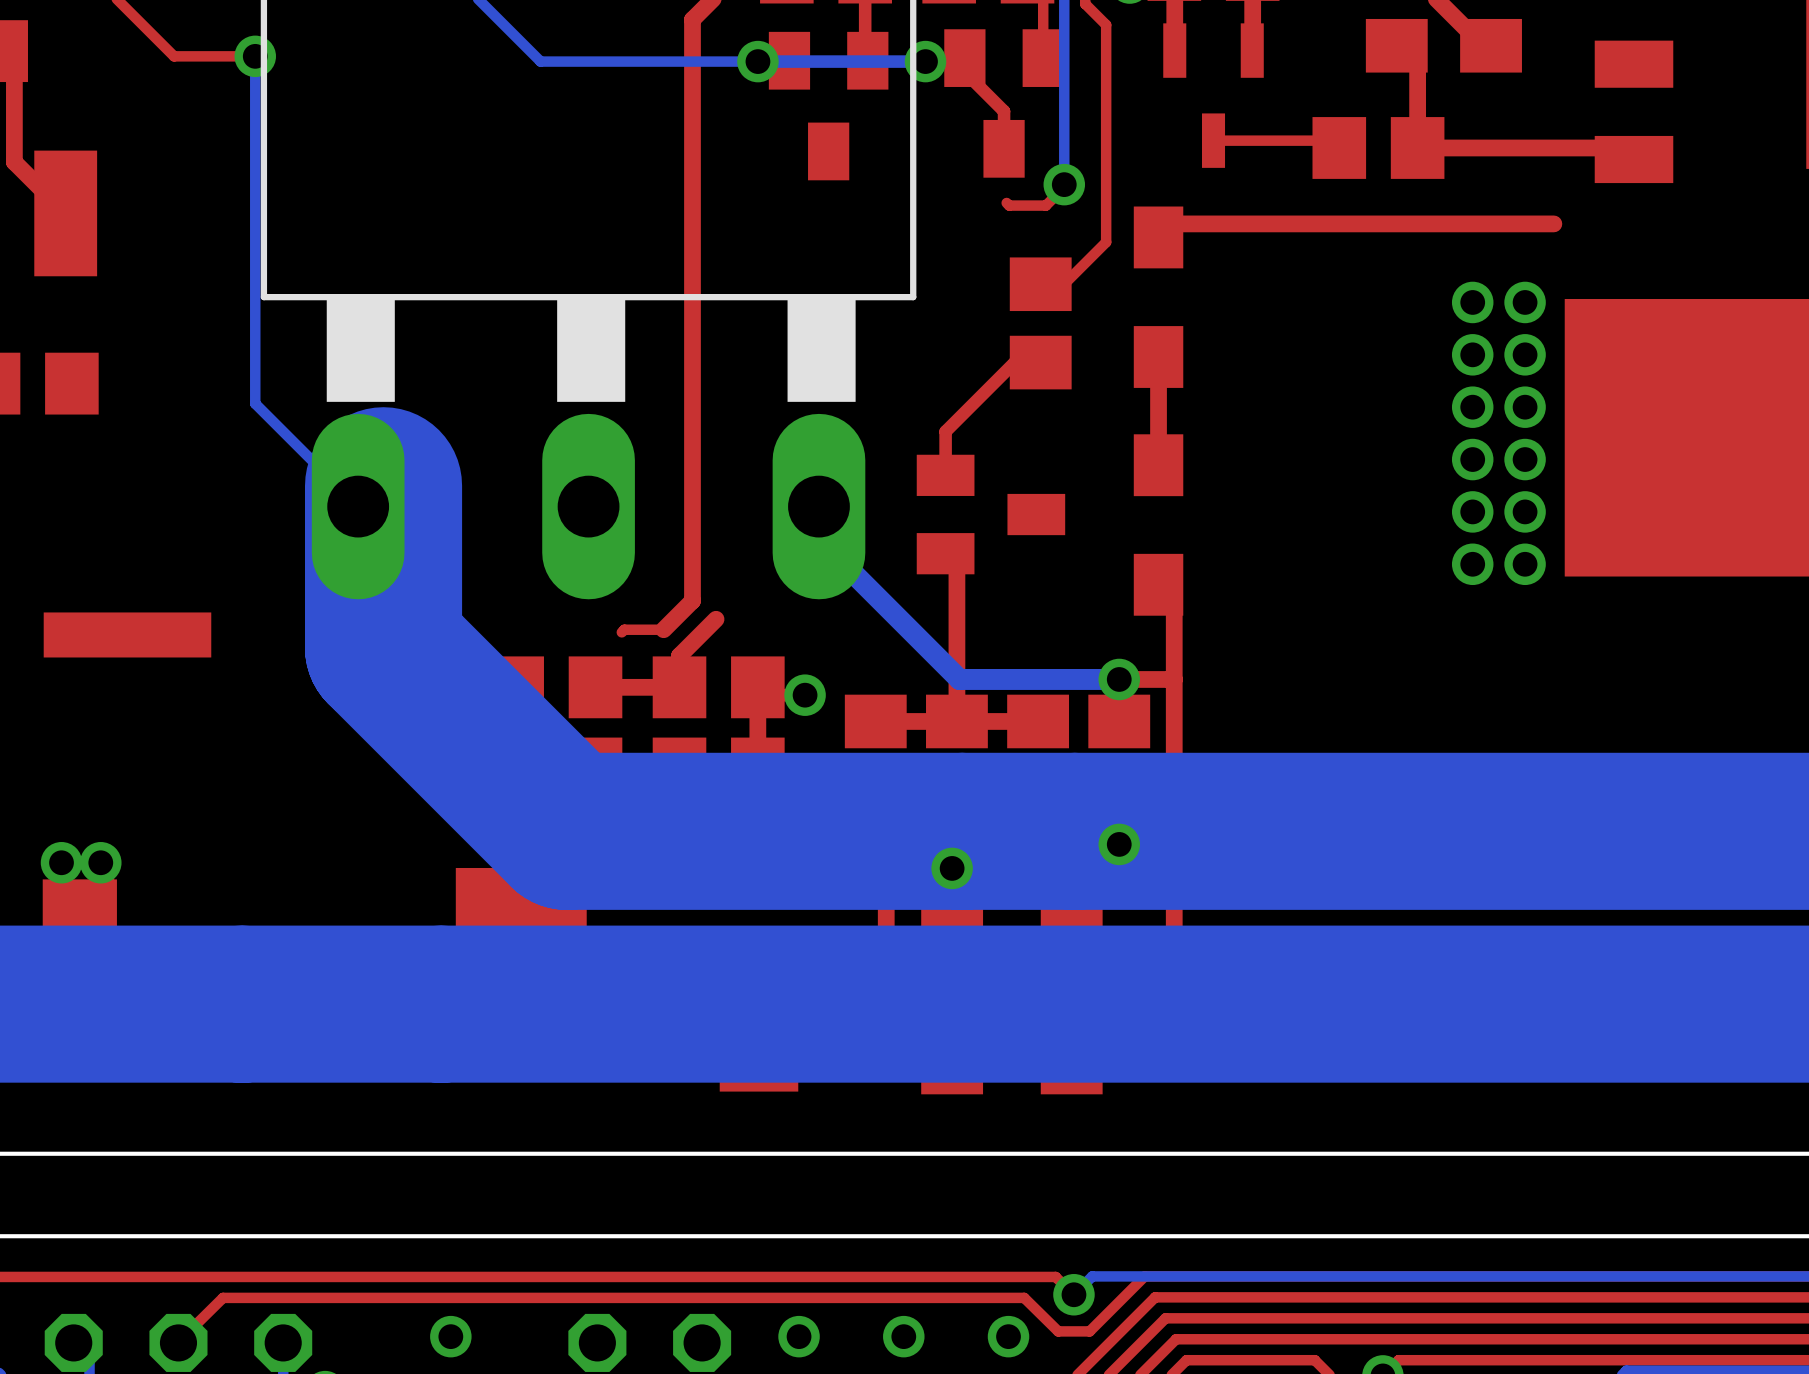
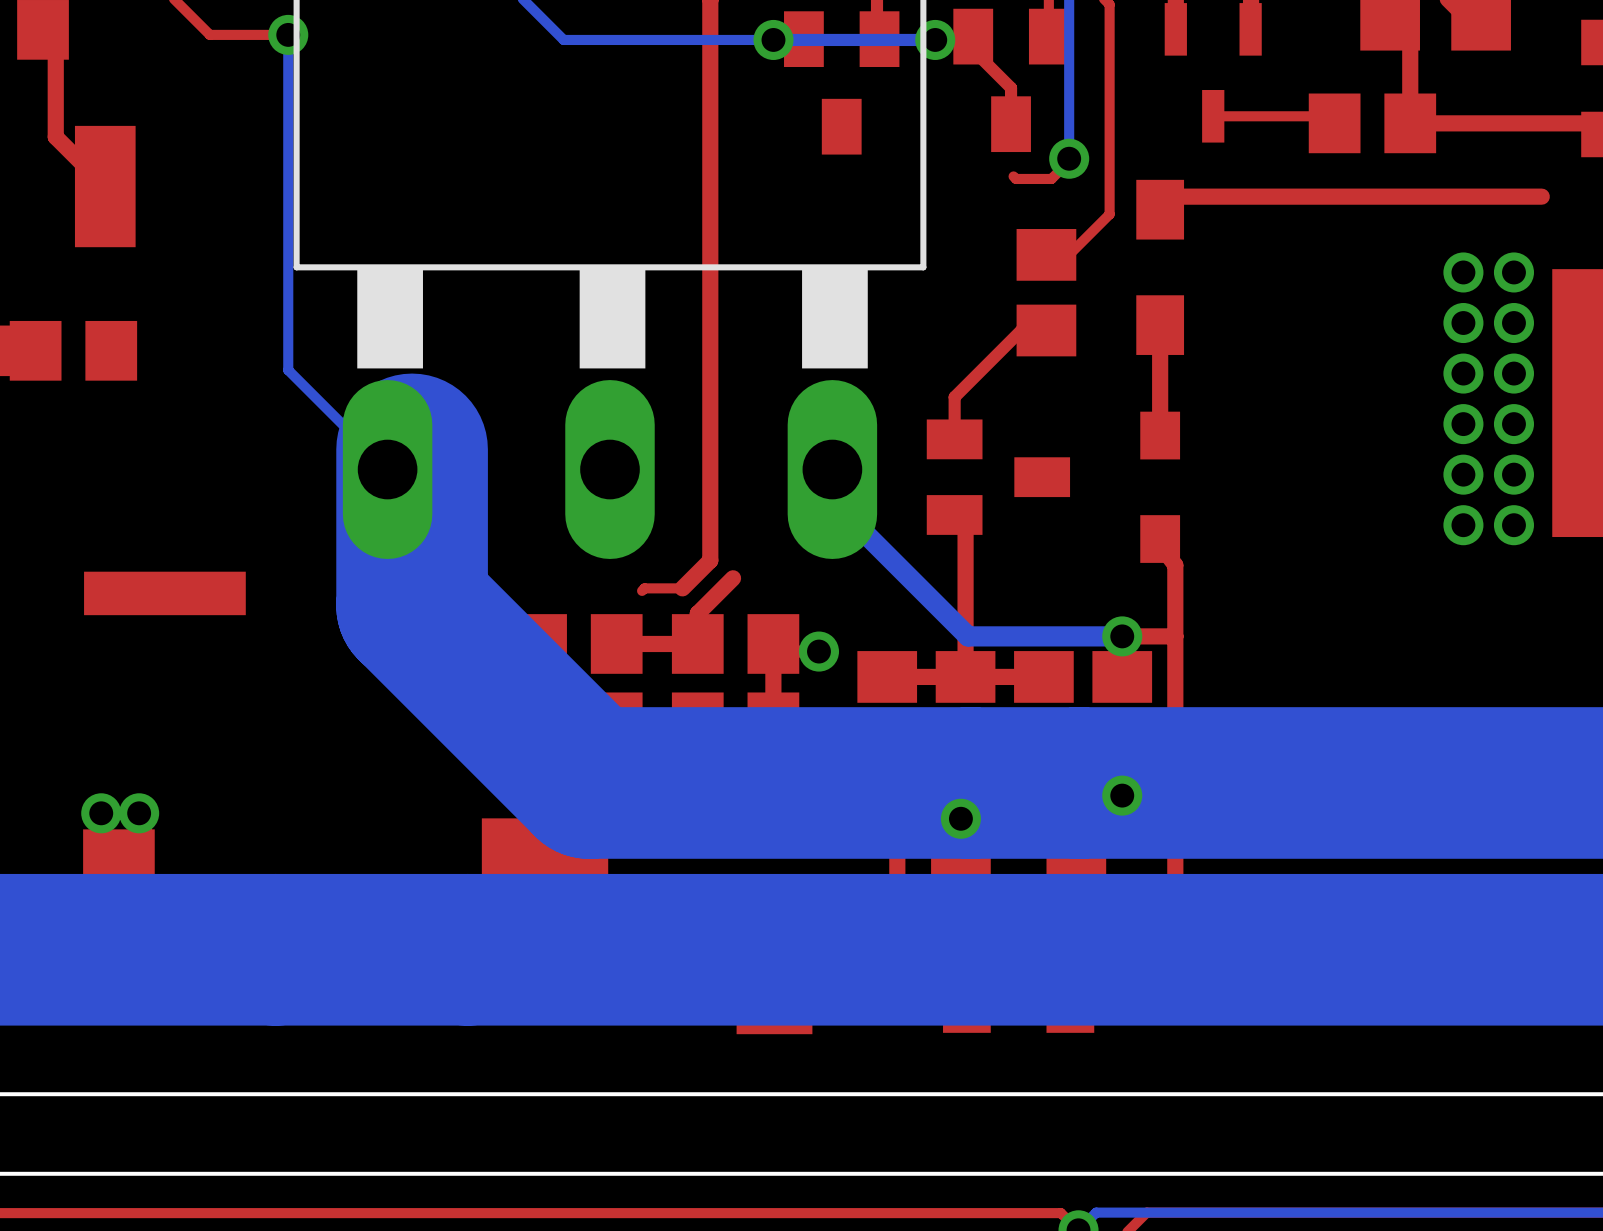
part footprint: [1133, 434, 1184, 616] -> [1140, 411, 1181, 563]
part footprint: [921, 1044, 1103, 1095] -> [943, 993, 1095, 1033]

